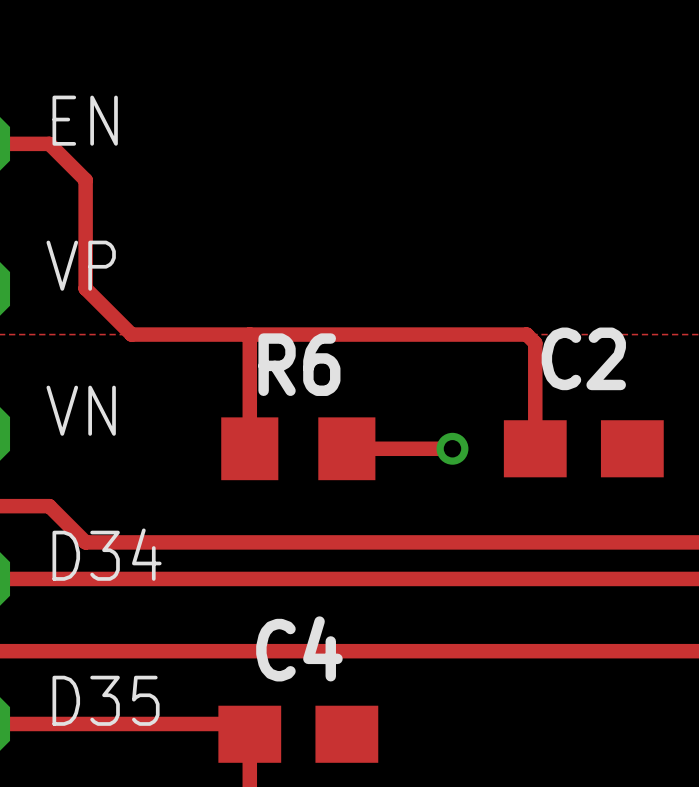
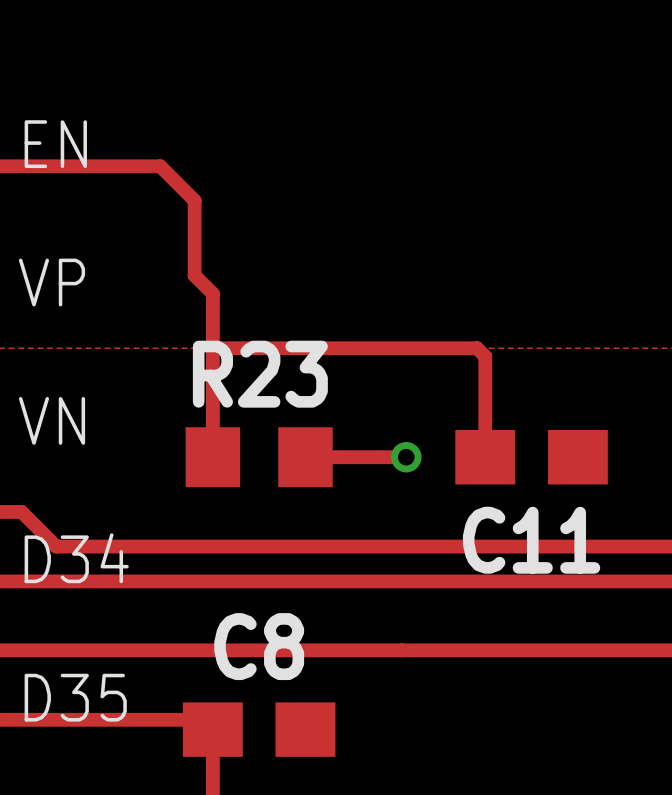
track: (49, 143) (85, 180) (85, 288) (131, 334) (249, 334) -> (21, 166) (160, 166) (194, 200) (194, 275) (212, 293) (212, 348)
C2 name: C2 (583, 358) -> C11 (531, 540)
R6 name: R6 (299, 364) -> R23 (260, 374)
C4 name: C4 (299, 648) -> C8 (259, 646)

